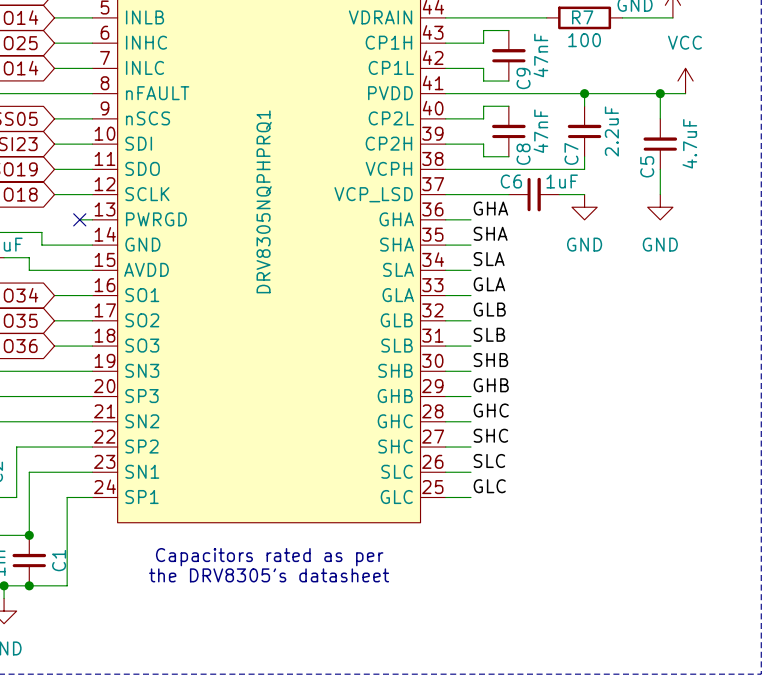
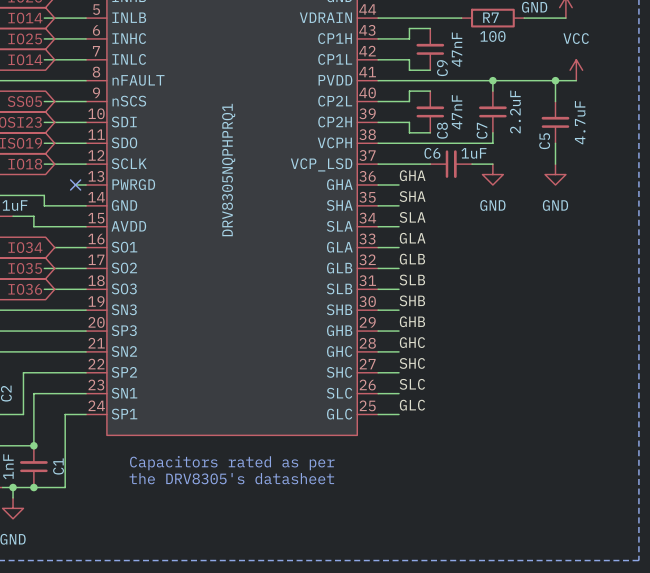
wire: none -> (44, 18) (54, 18)
wire: none -> (44, 38) (54, 38)
wire: none -> (44, 59) (54, 59)
wire: none -> (44, 101) (54, 101)
wire: none -> (44, 122) (54, 122)
wire: none -> (44, 143) (54, 143)
wire: none -> (44, 164) (54, 164)
wire: none -> (44, 268) (54, 268)
wire: none -> (44, 289) (54, 289)

